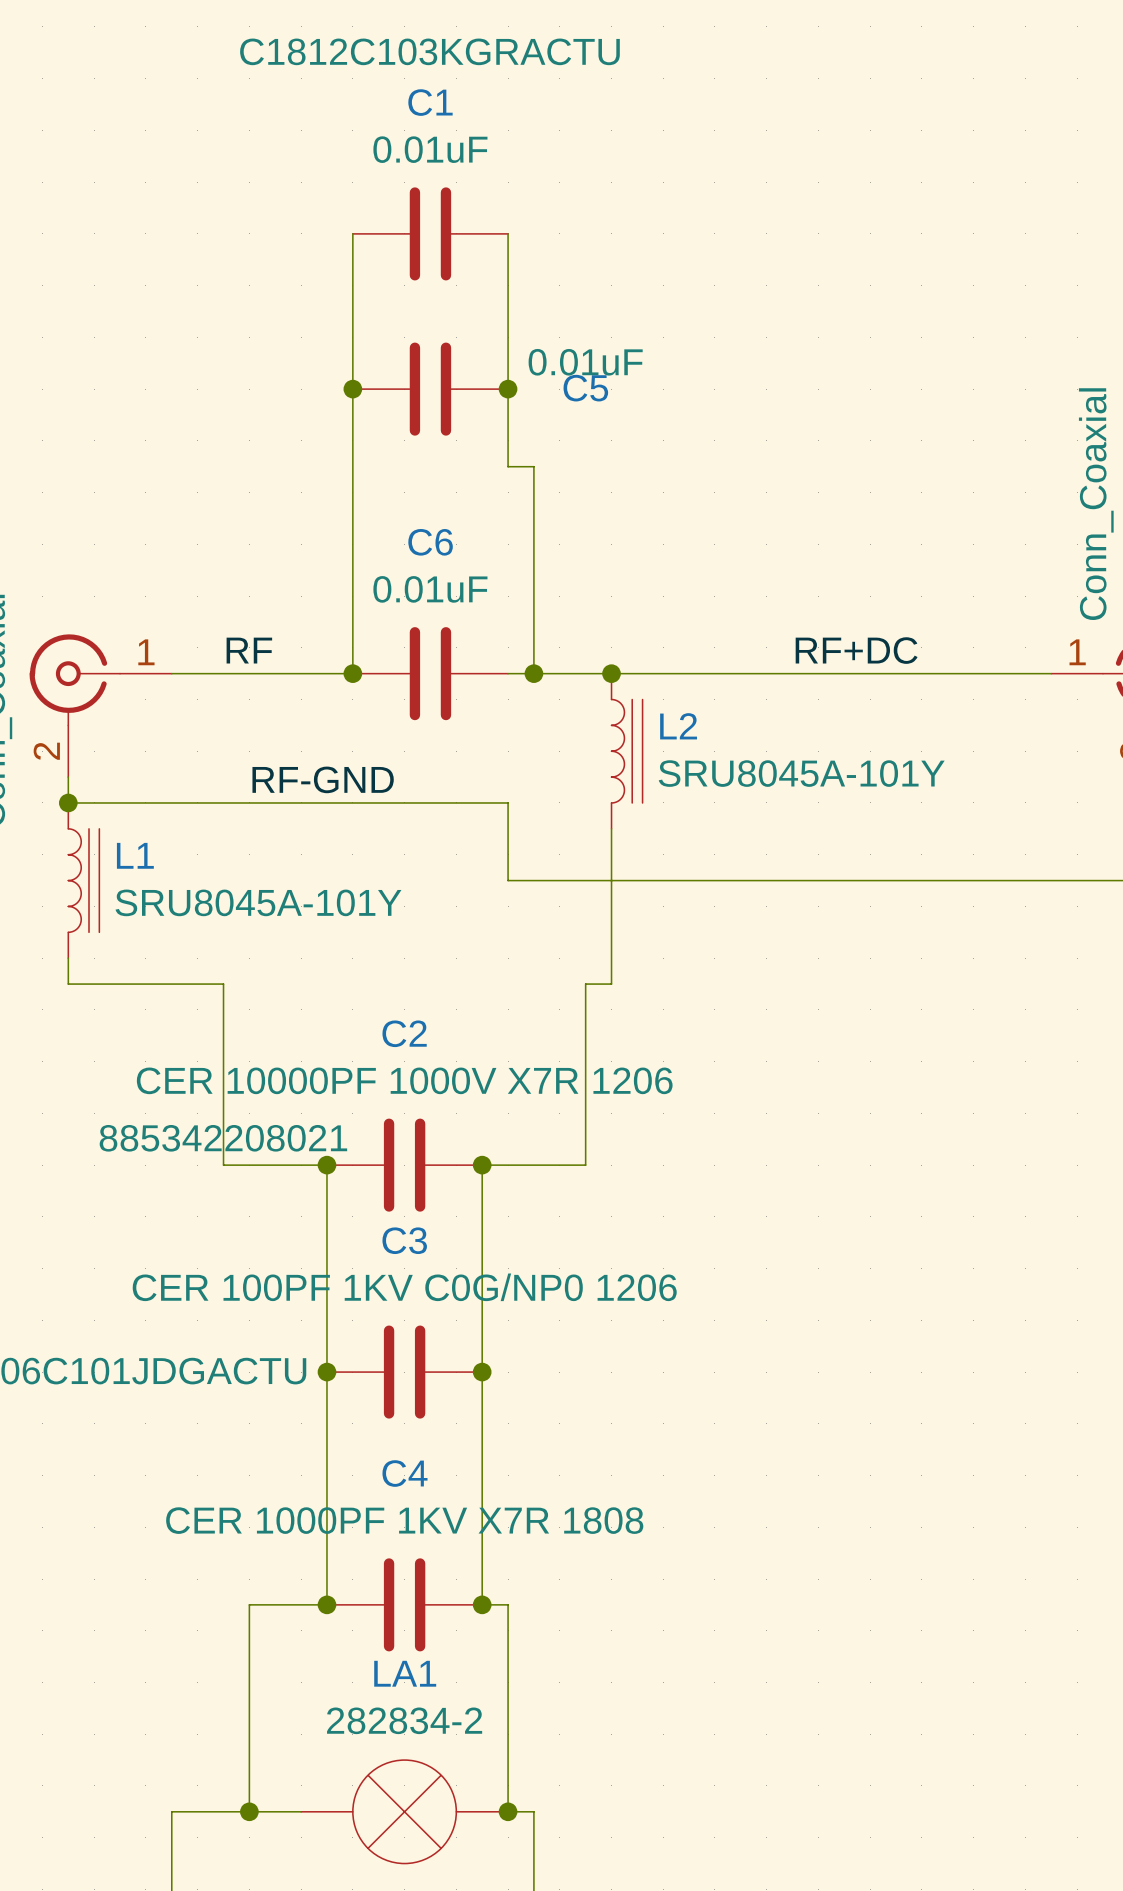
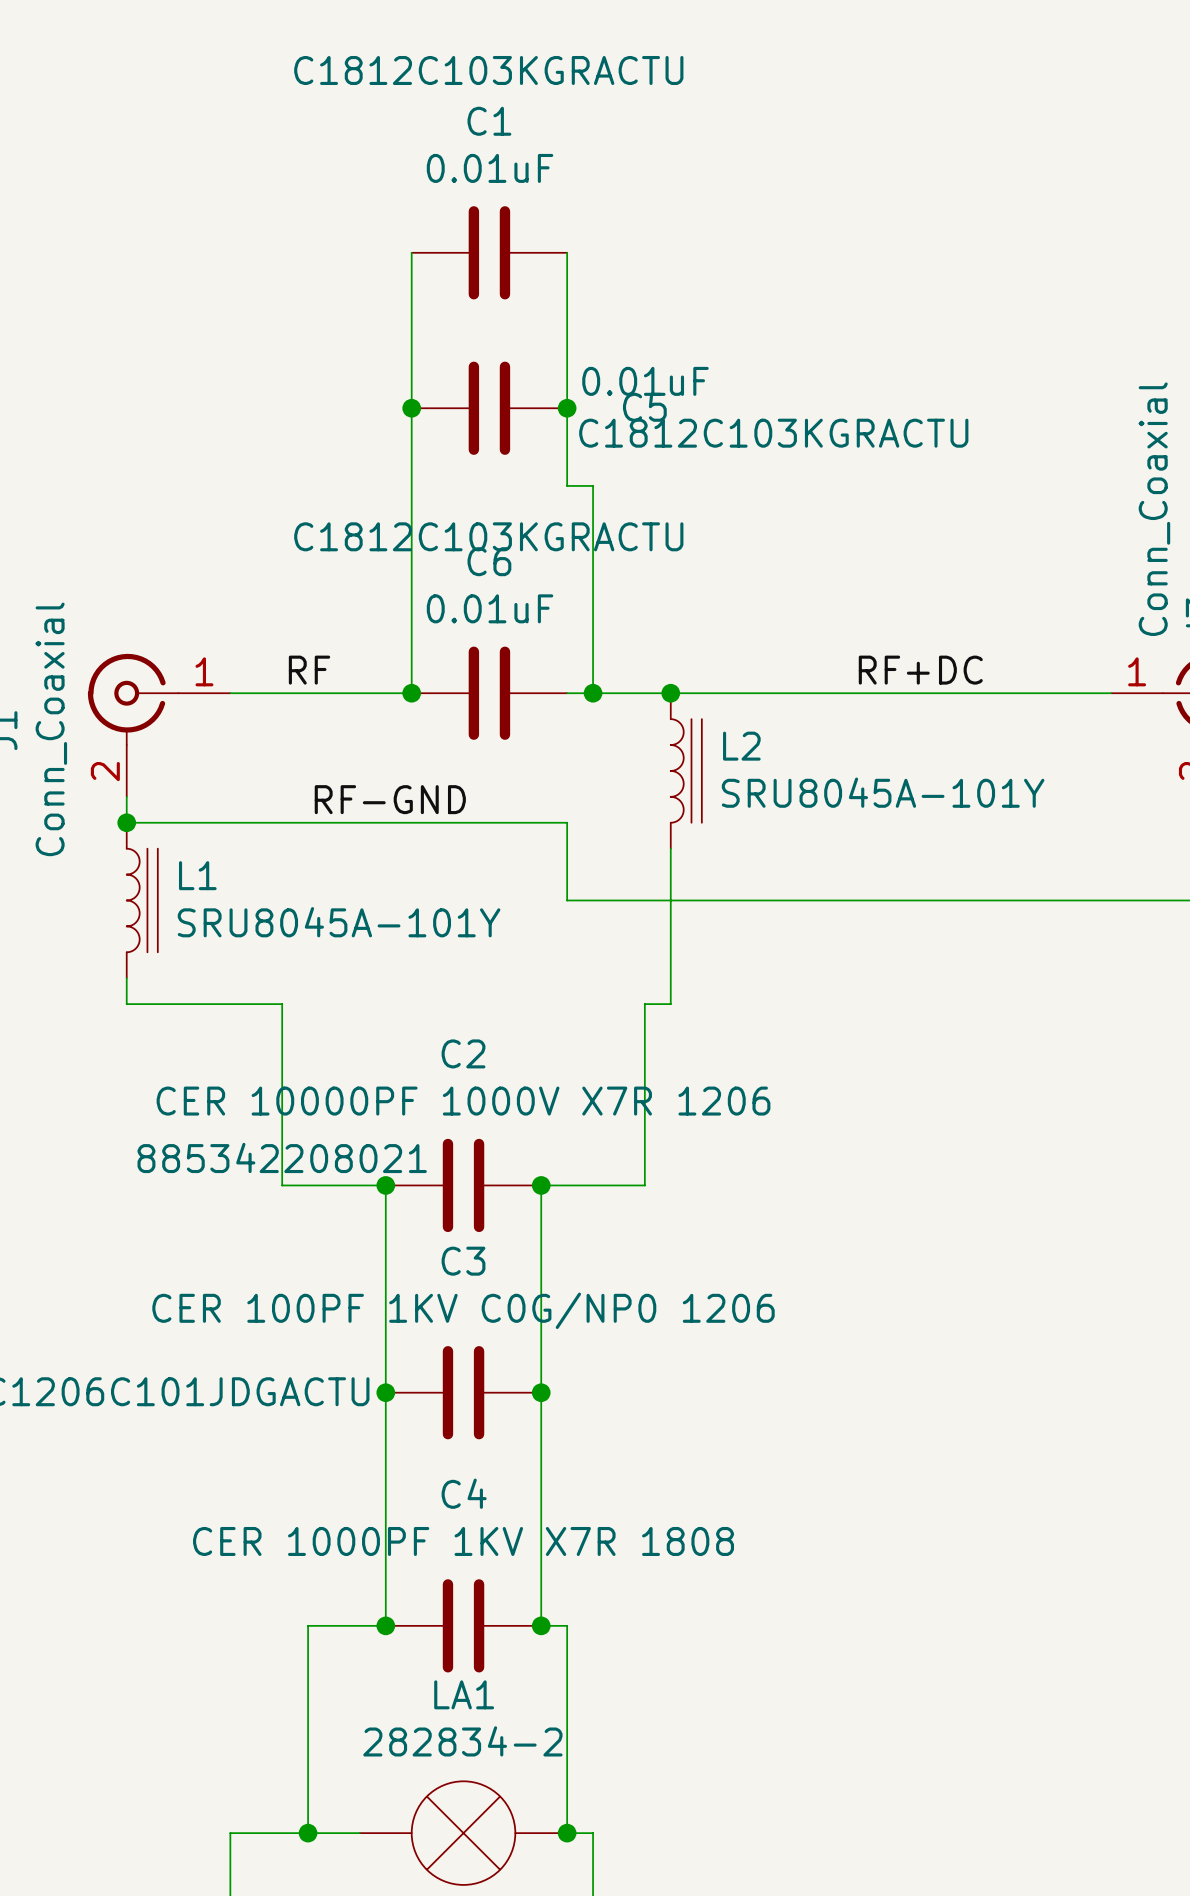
C5 text: none -> C1812C103KGRACTU (773, 433)
C6 text: none -> C1812C103KGRACTU (488, 536)

